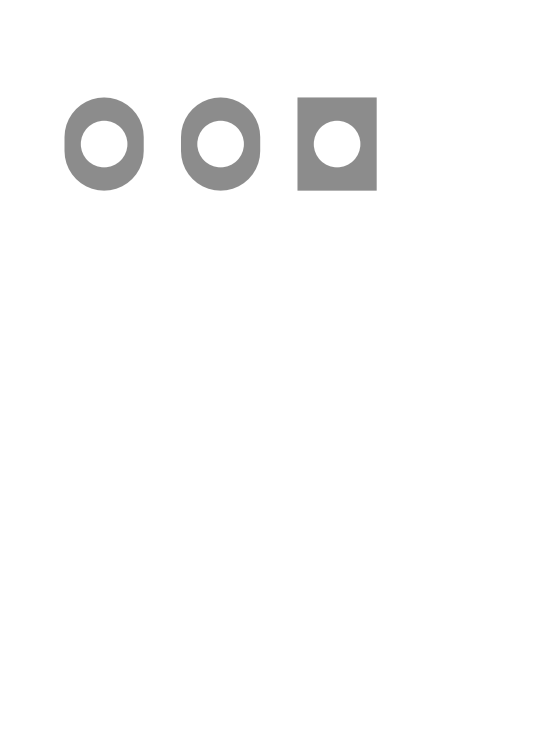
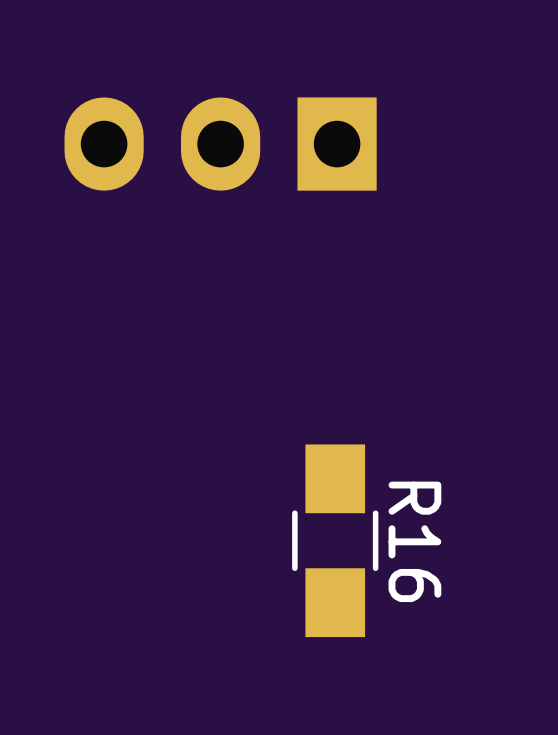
R16: none -> (335, 540)

